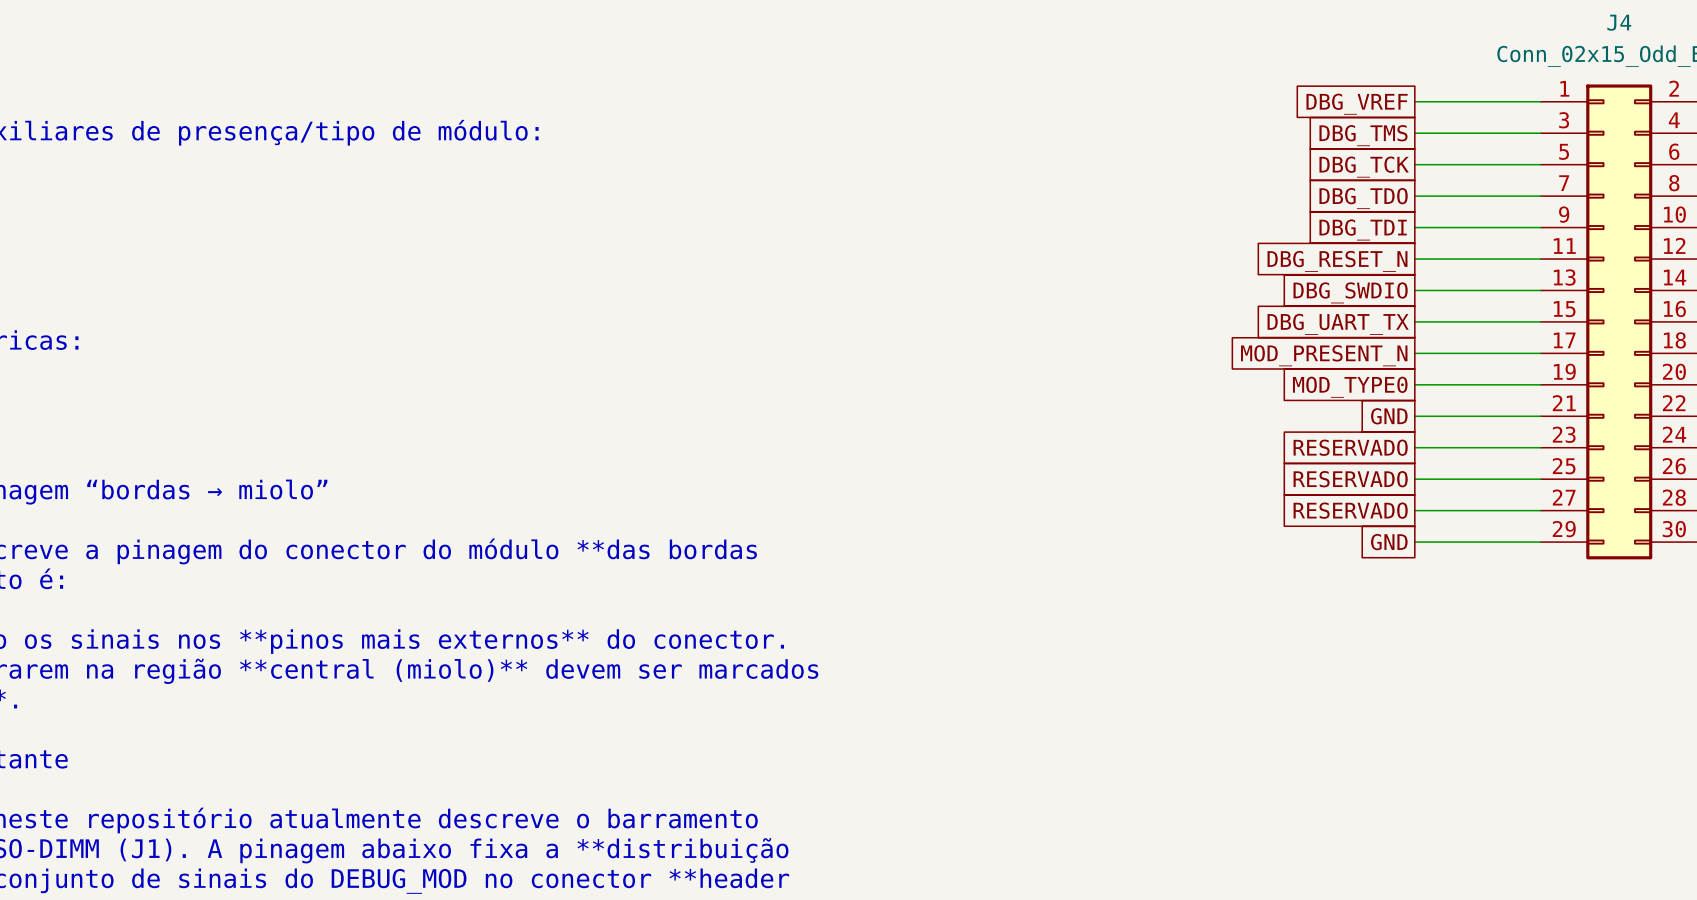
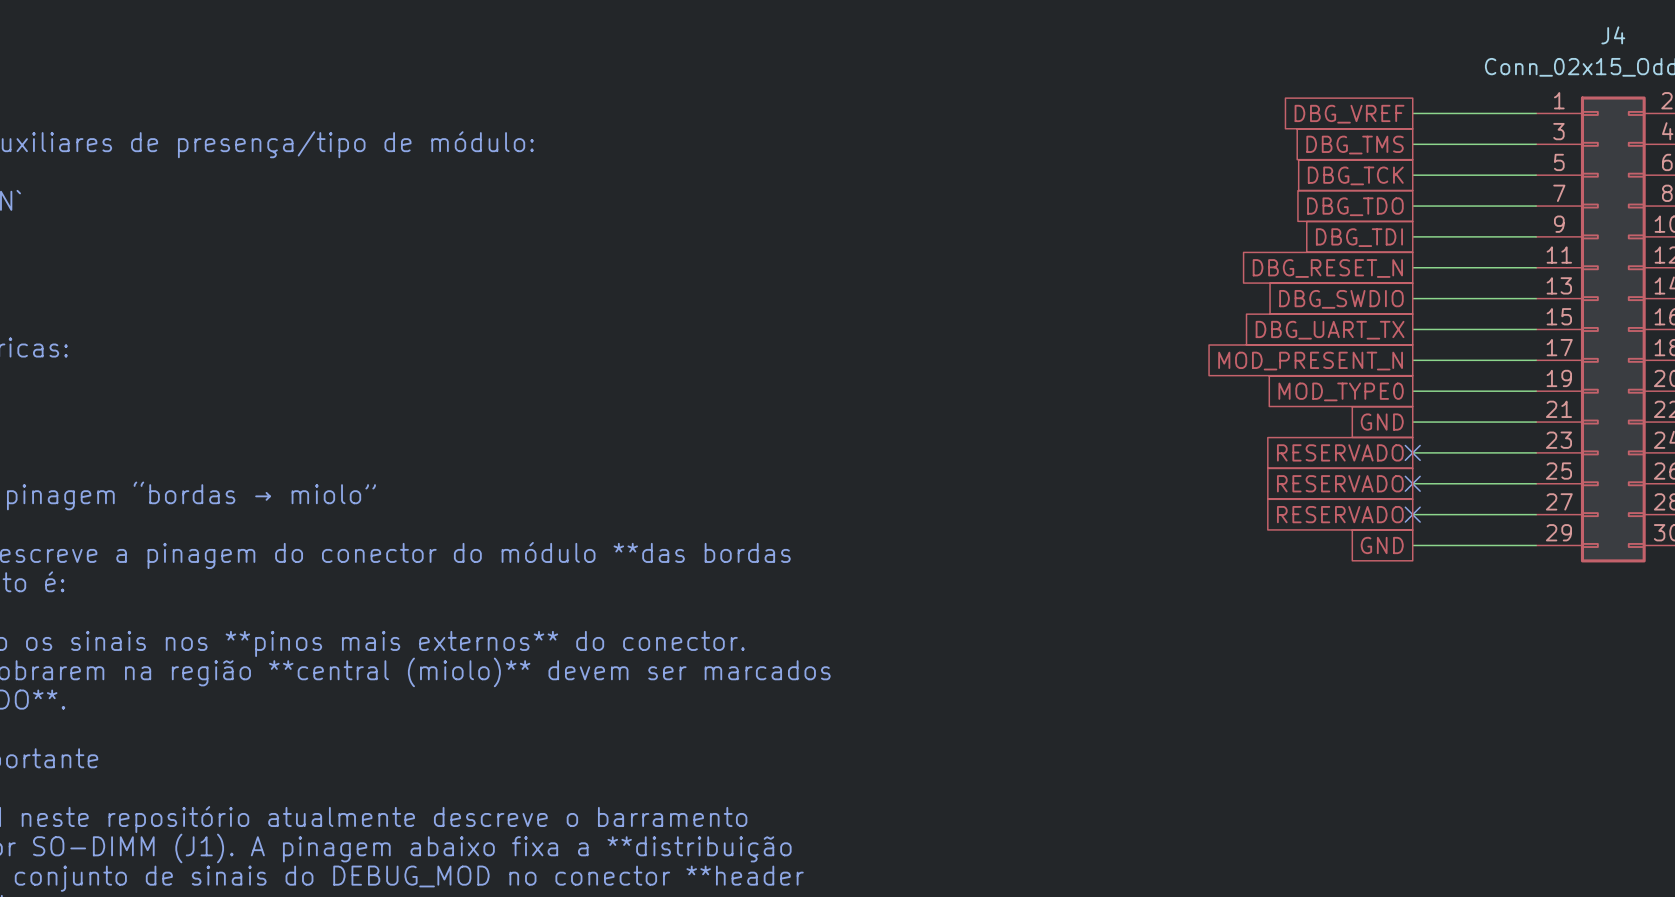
no-connect mark: none -> (1412, 452)
no-connect mark: none -> (1412, 483)
no-connect mark: none -> (1412, 514)

